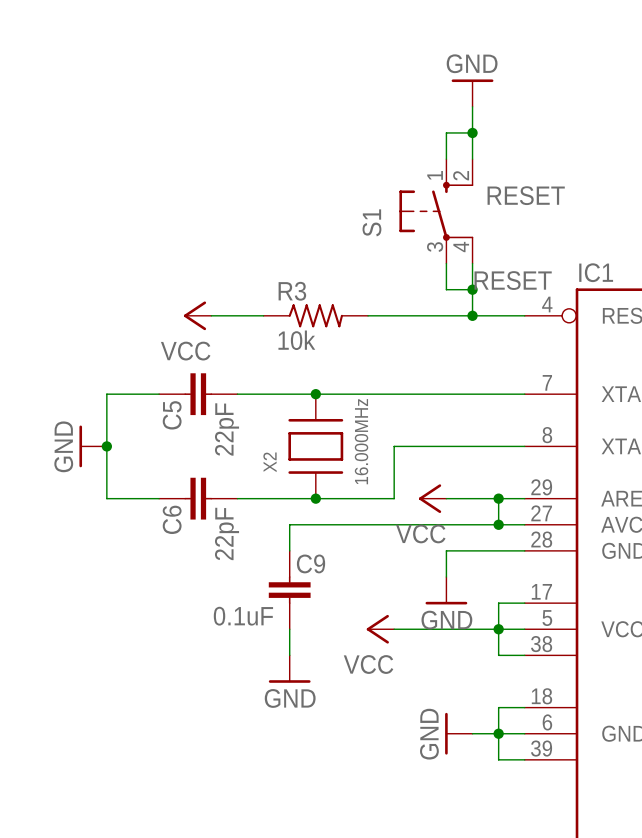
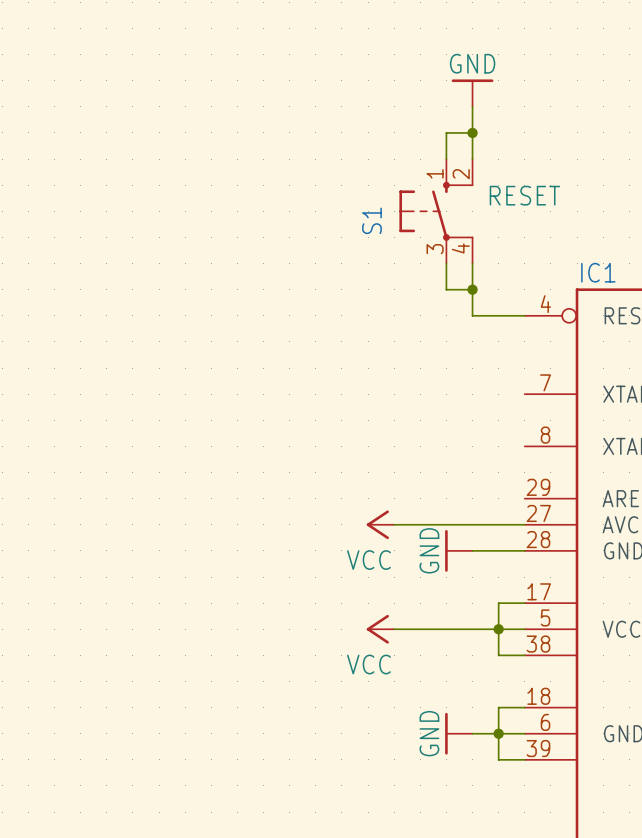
label: RESET (513, 280) -> none
power symbol: VCC (197, 315) -> none
wire: (211, 315) (263, 315) -> none
R3: 10k (315, 315) -> none
wire: (368, 315) (472, 315) -> none
junction: (472, 315) -> none
wire: (159, 394) (106, 394) (106, 498) (159, 498) -> none
C5: 22pF (198, 394) -> none
wire: (237, 394) (524, 394) -> none
junction: (315, 394) -> none
power symbol: GND (93, 446) -> none
junction: (106, 446) -> none
X2: 16.000MHz (315, 446) -> none
wire: (524, 446) (394, 446) (394, 498) (237, 498) -> none
C6: 22pF (198, 498) -> none
junction: (315, 498) -> none
power symbol position: VCC (432, 498) -> VCC (380, 524)
wire: (446, 498) (524, 498) -> none
wire: (498, 498) (498, 524) -> none
junction: (498, 498) -> none
wire: (394, 524) (289, 524) (289, 550) -> none
junction: (498, 524) -> none
C9: 0.1uF (289, 590) -> none
power symbol position: GND (446, 590) -> GND (458, 550)
power symbol rotation: 0° (446, 603) -> 90° clockwise (446, 550)
wire: (289, 629) (289, 655) -> none
power symbol: GND (289, 669) -> none

